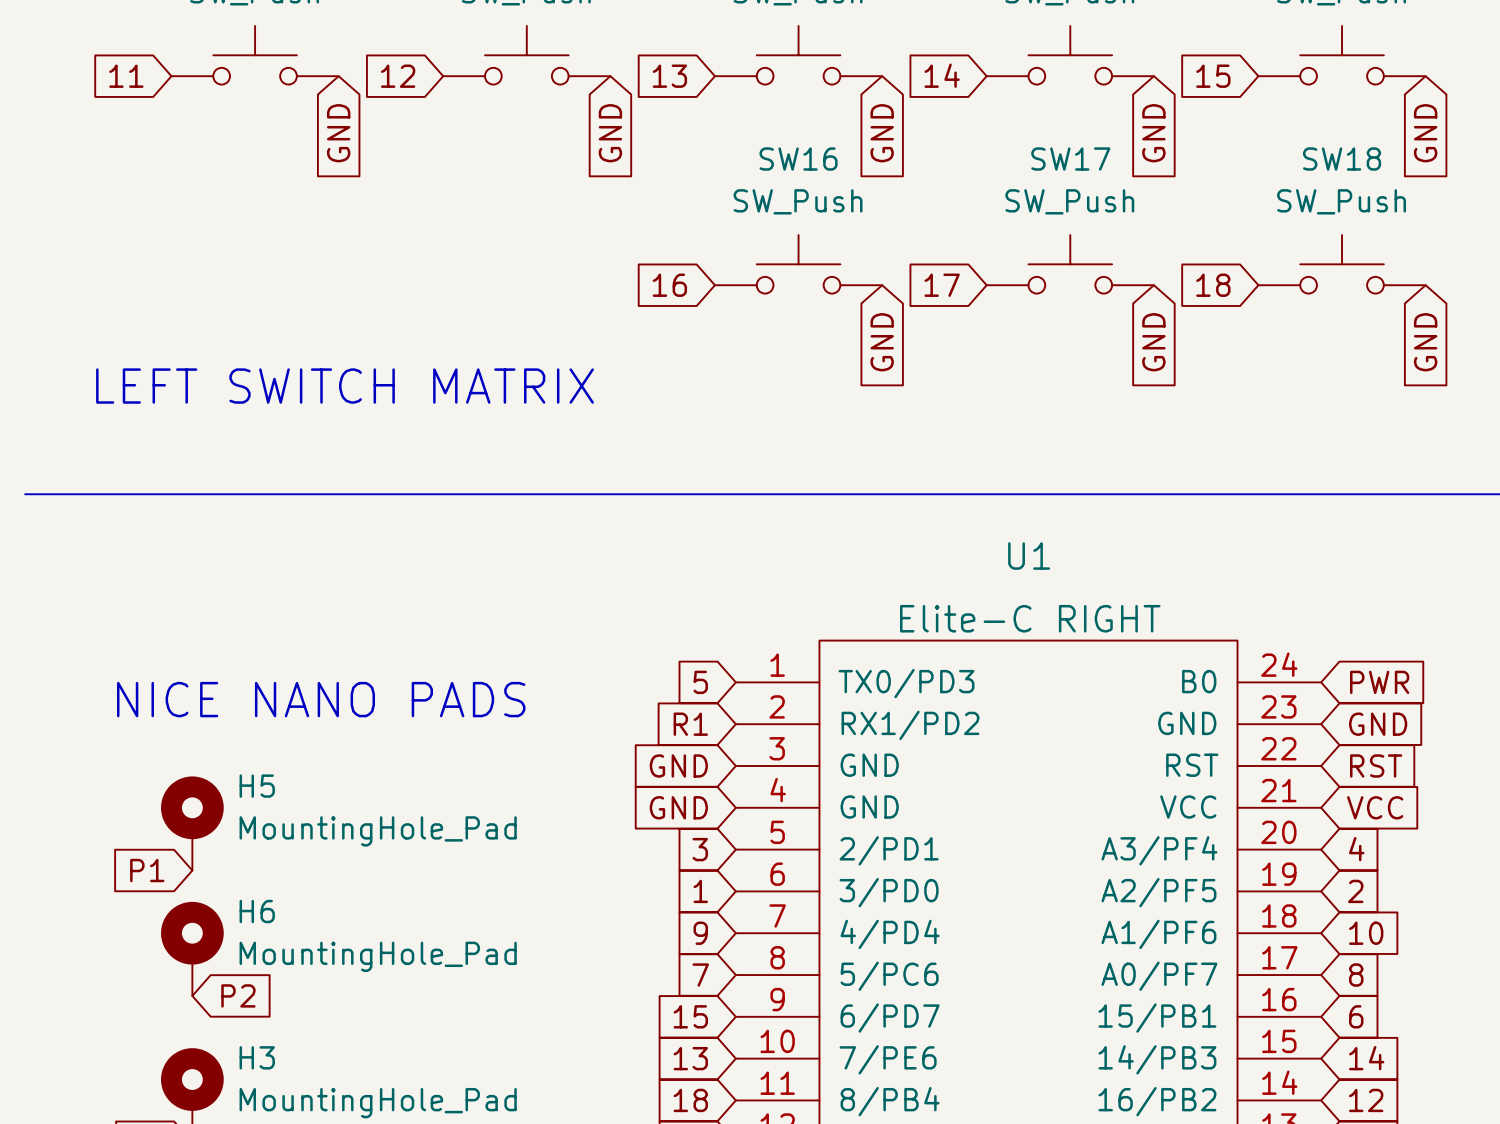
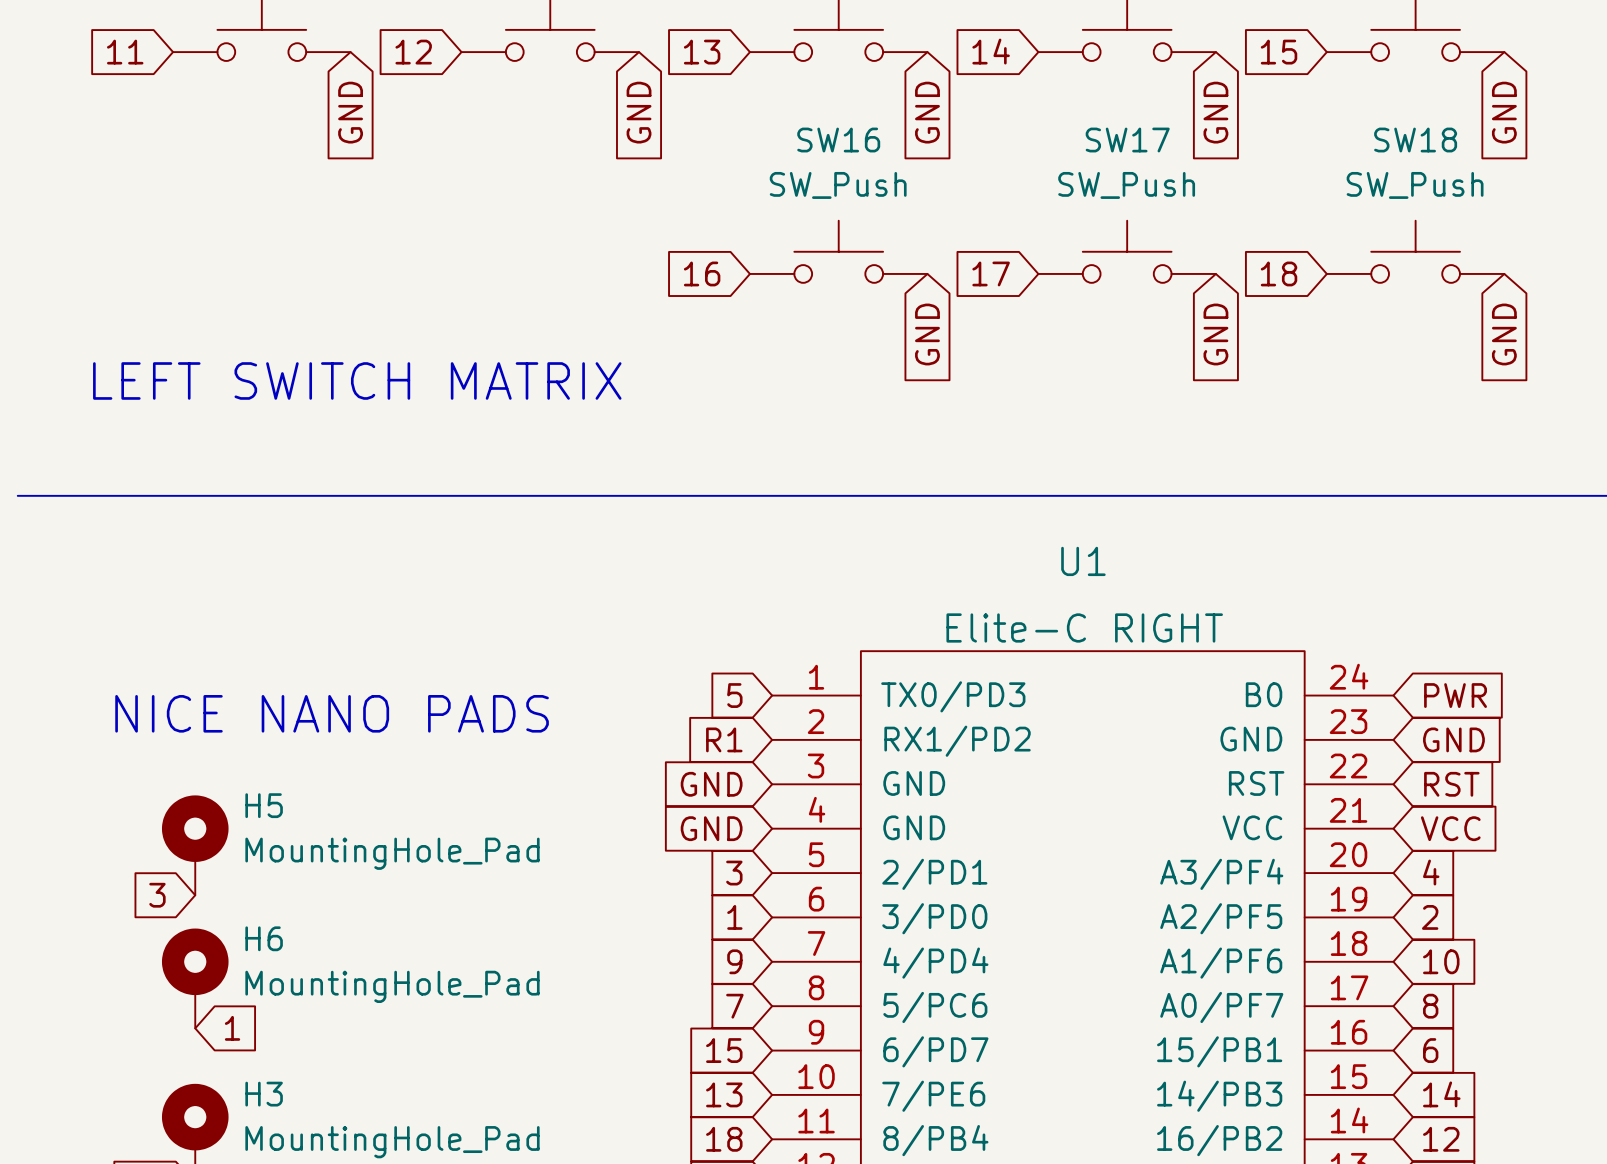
global label: P1 (147, 870) -> 3 (157, 895)
global label: P2 (238, 995) -> 1 (232, 1028)

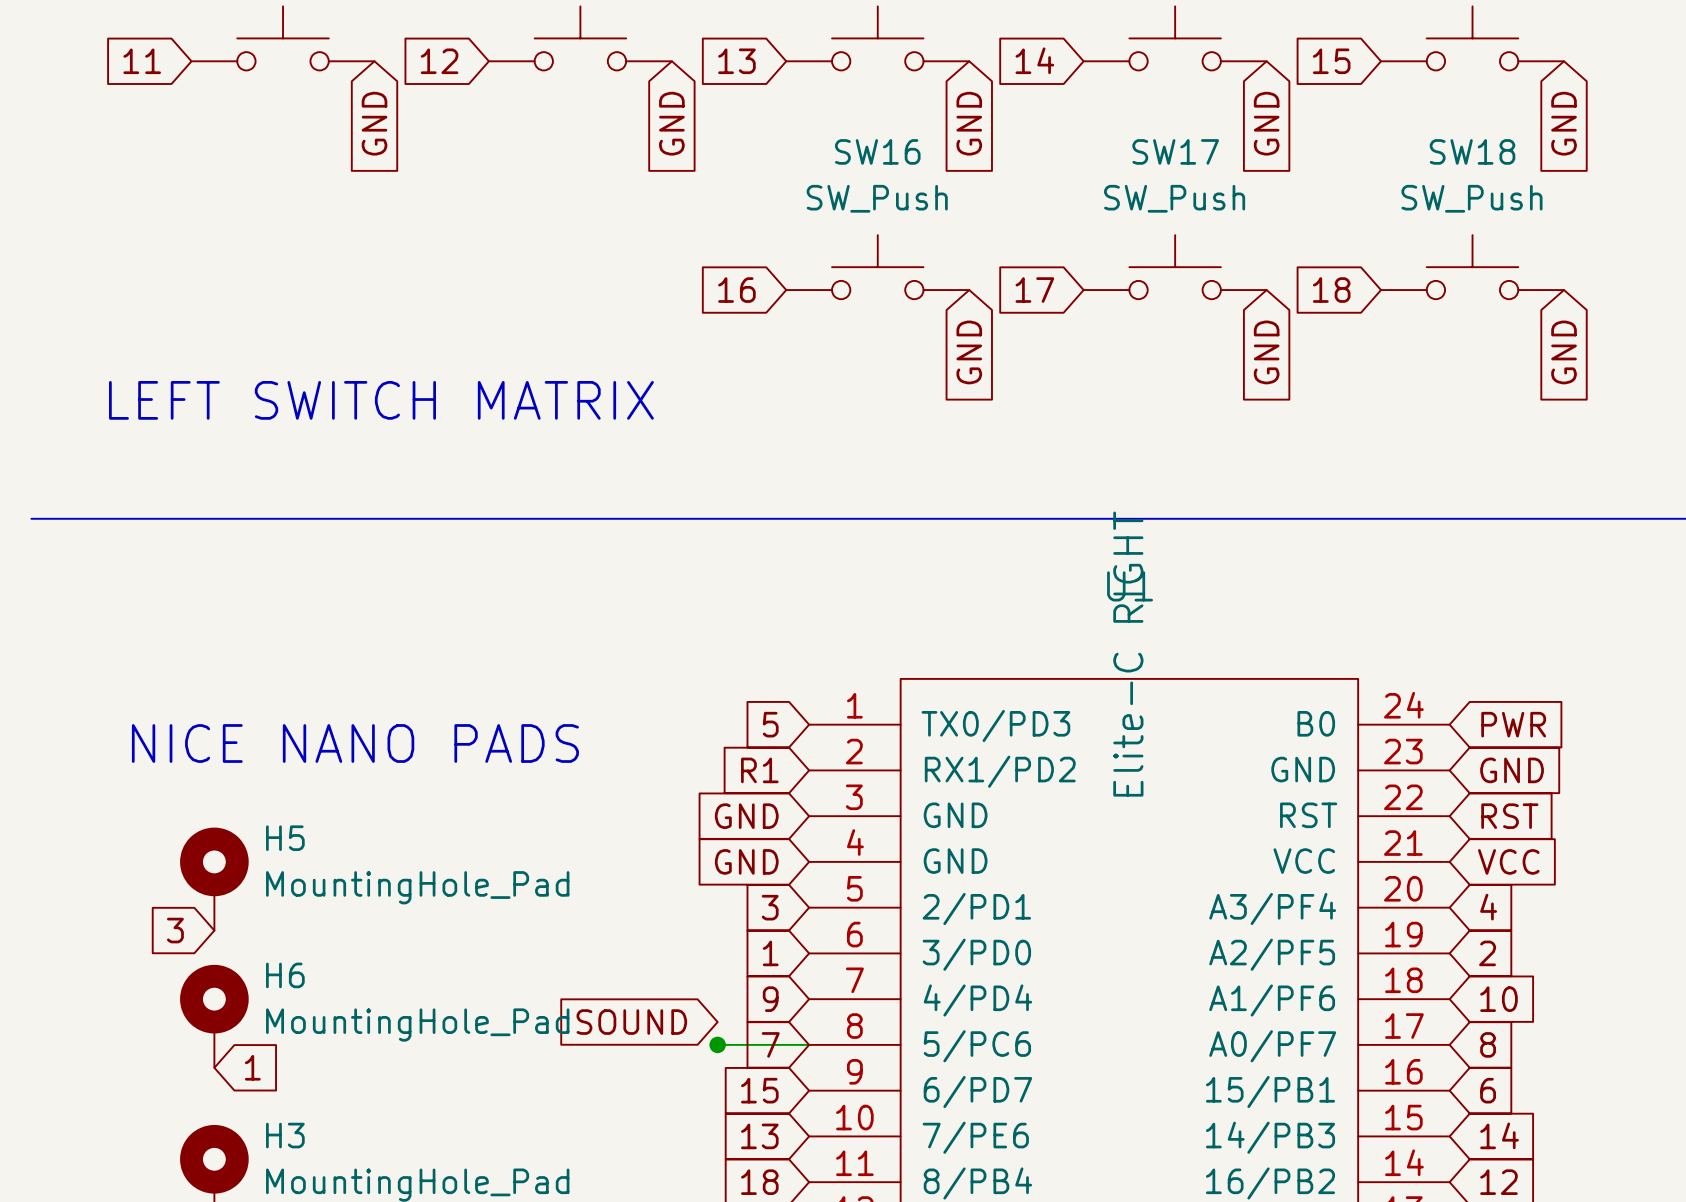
U1 value rotation: 0° (1084, 627) -> 90° counterclockwise (1128, 654)
global label: none -> SOUND (631, 1022)
wire: none -> (717, 1044) (809, 1044)
junction: none -> (717, 1044)

